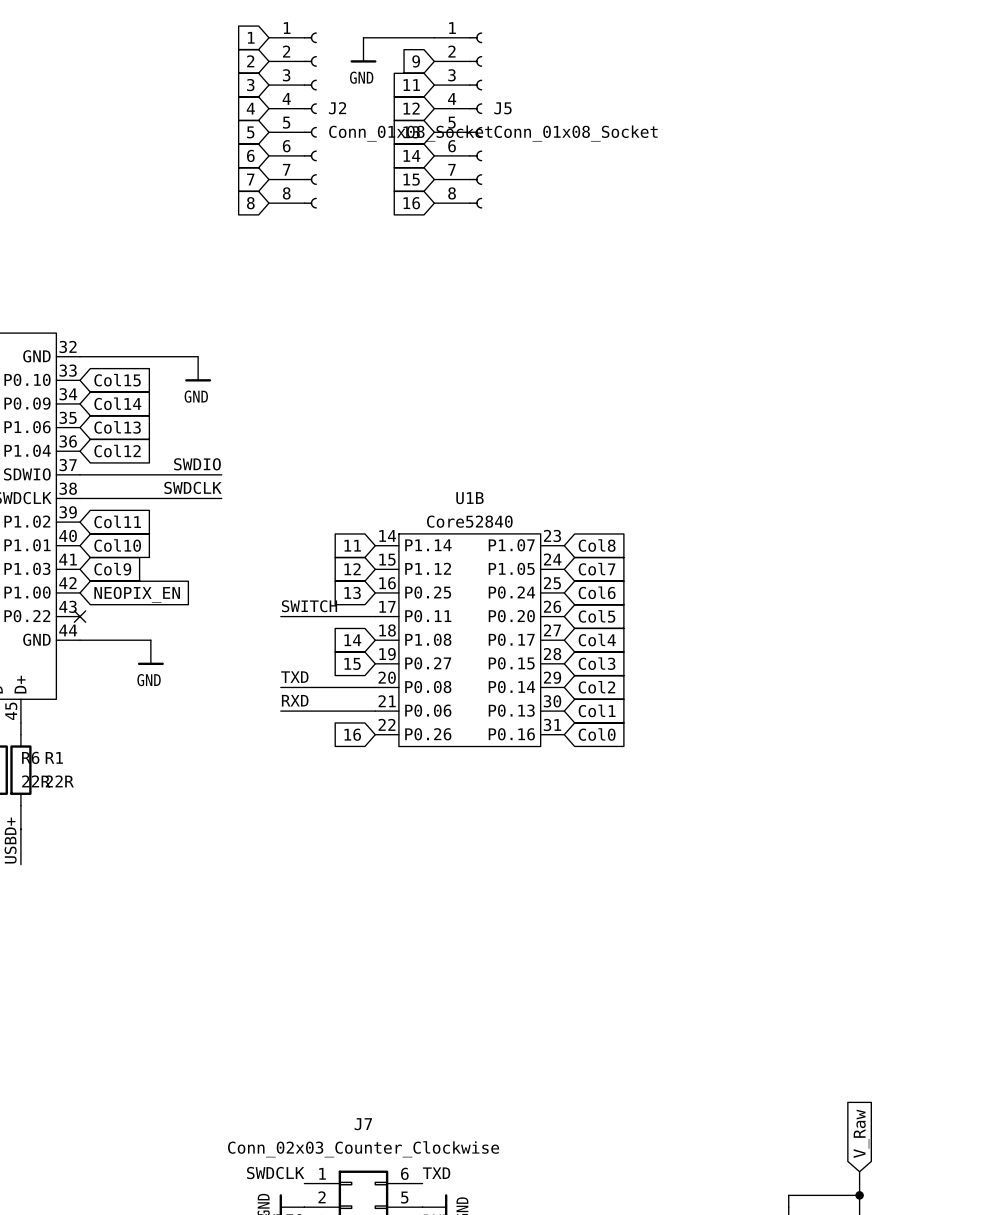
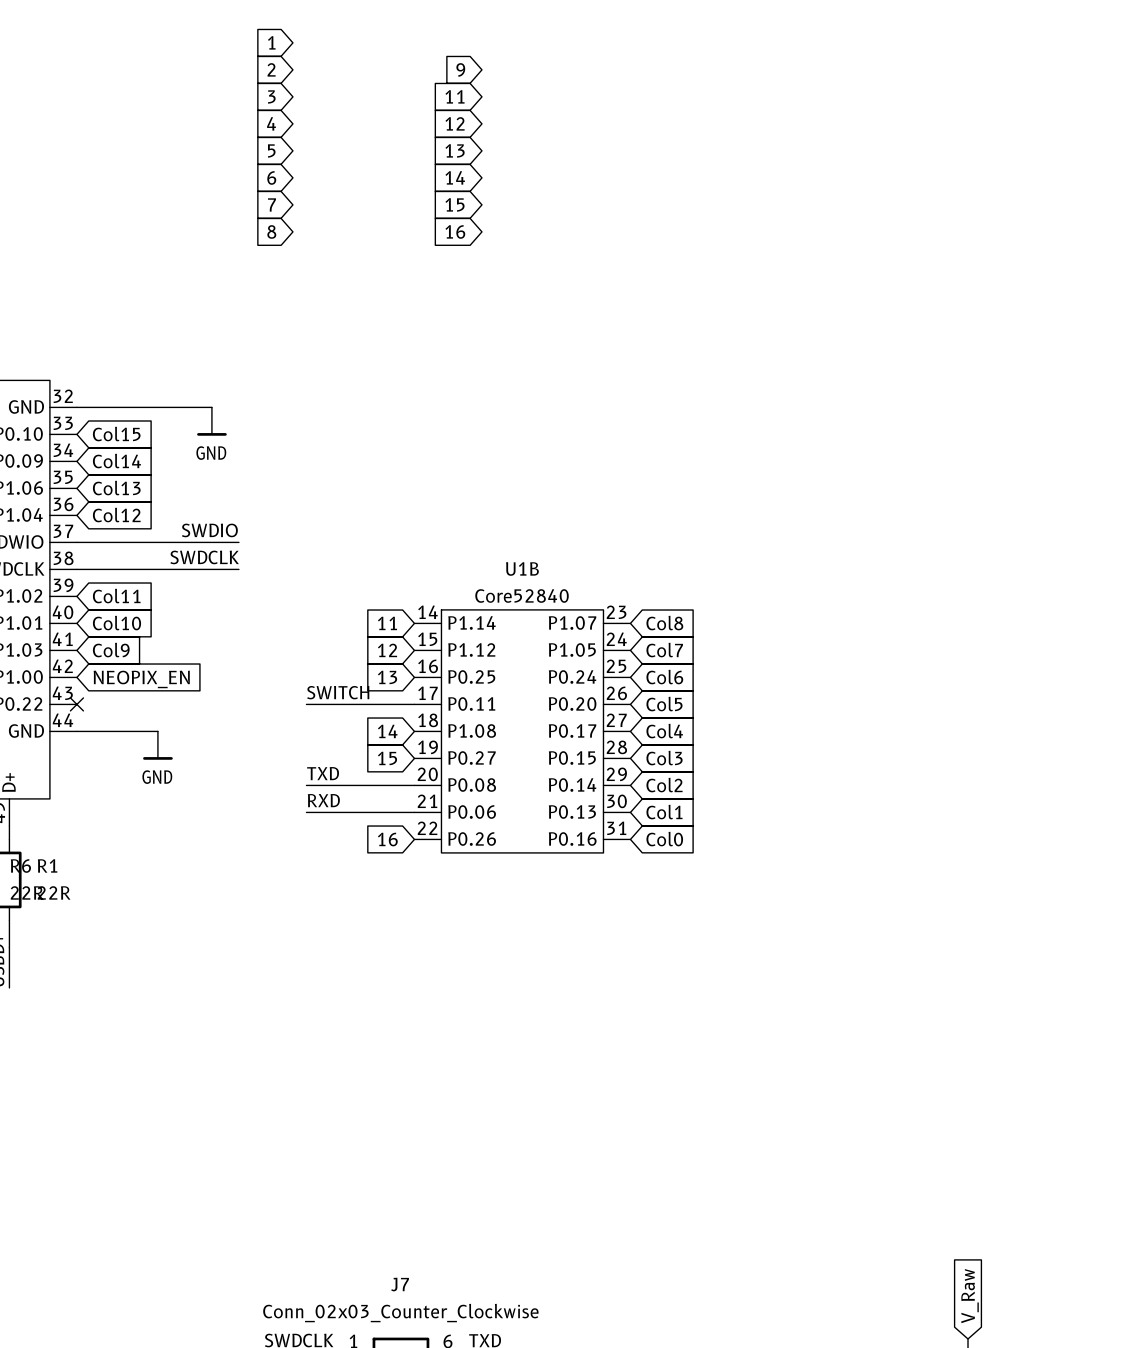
wire: (363, 37) (434, 37) -> none
power symbol: GND (363, 50) -> none
J2: Conn_01x08_Socket (292, 120) -> none
J5: Conn_01x08_Socket (458, 120) -> none

